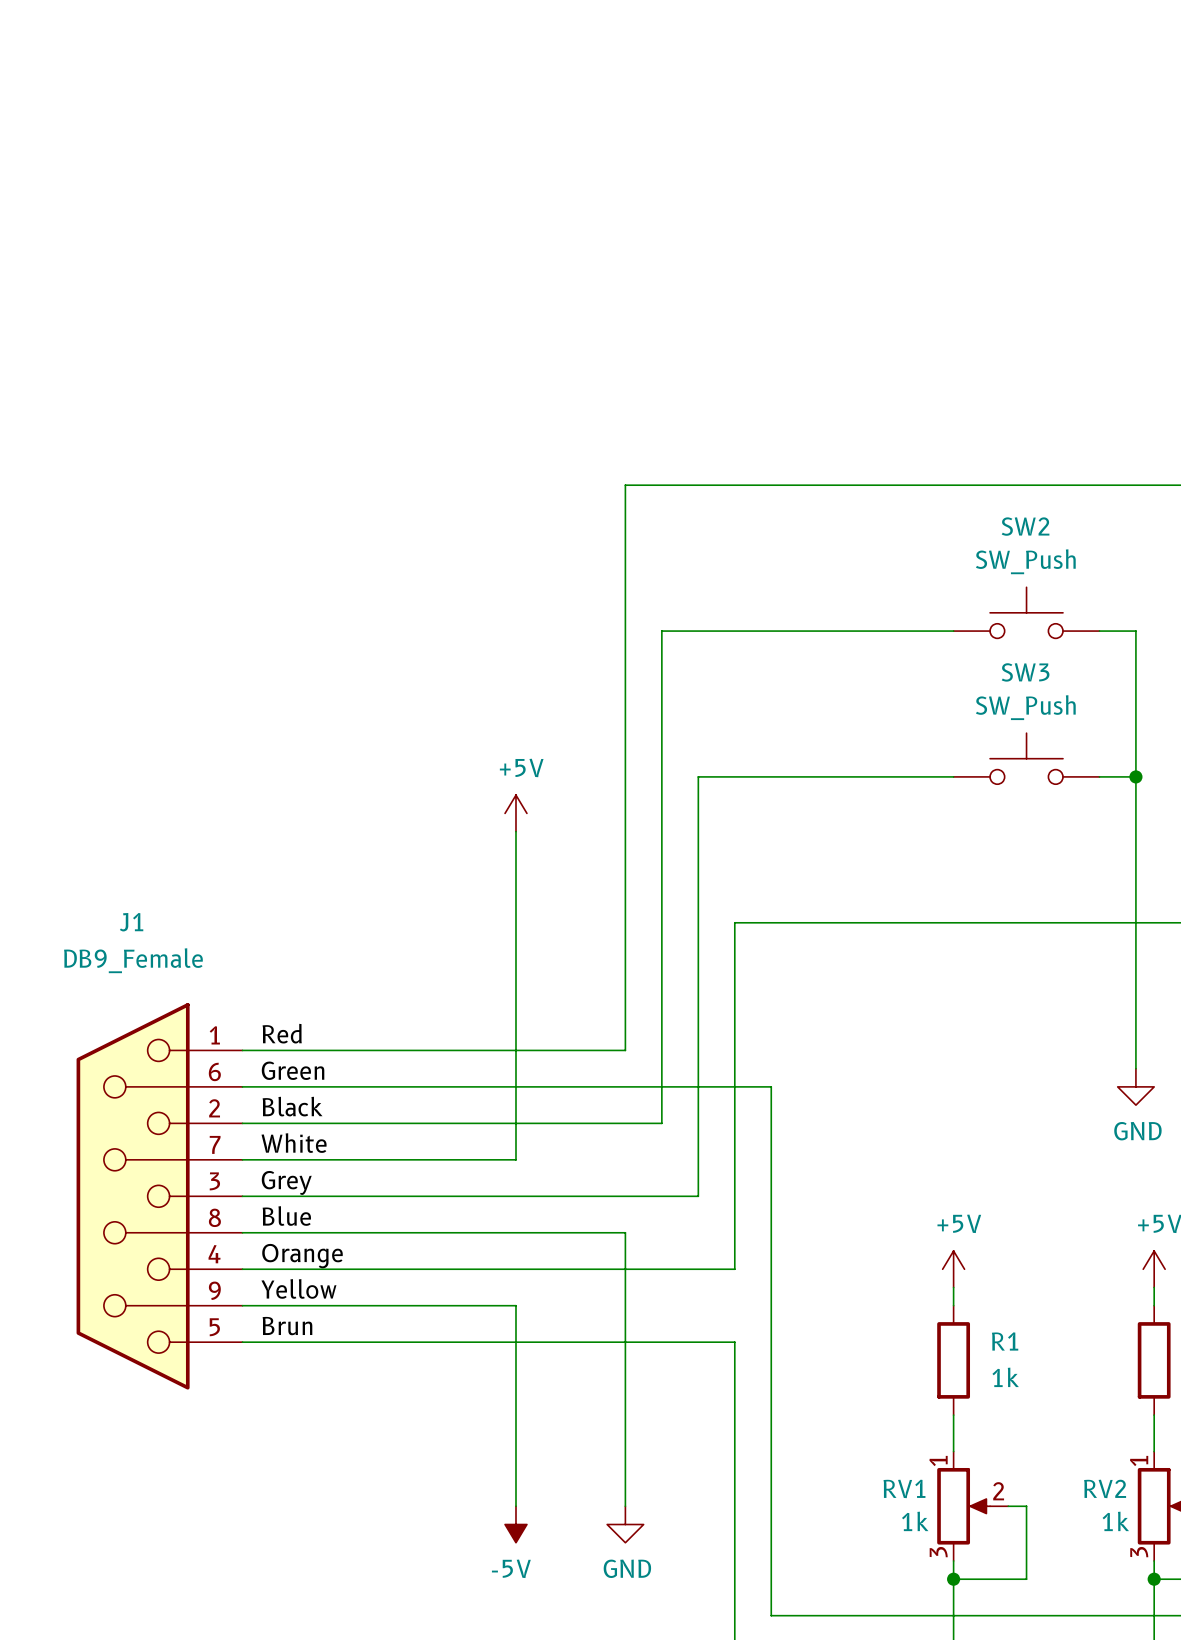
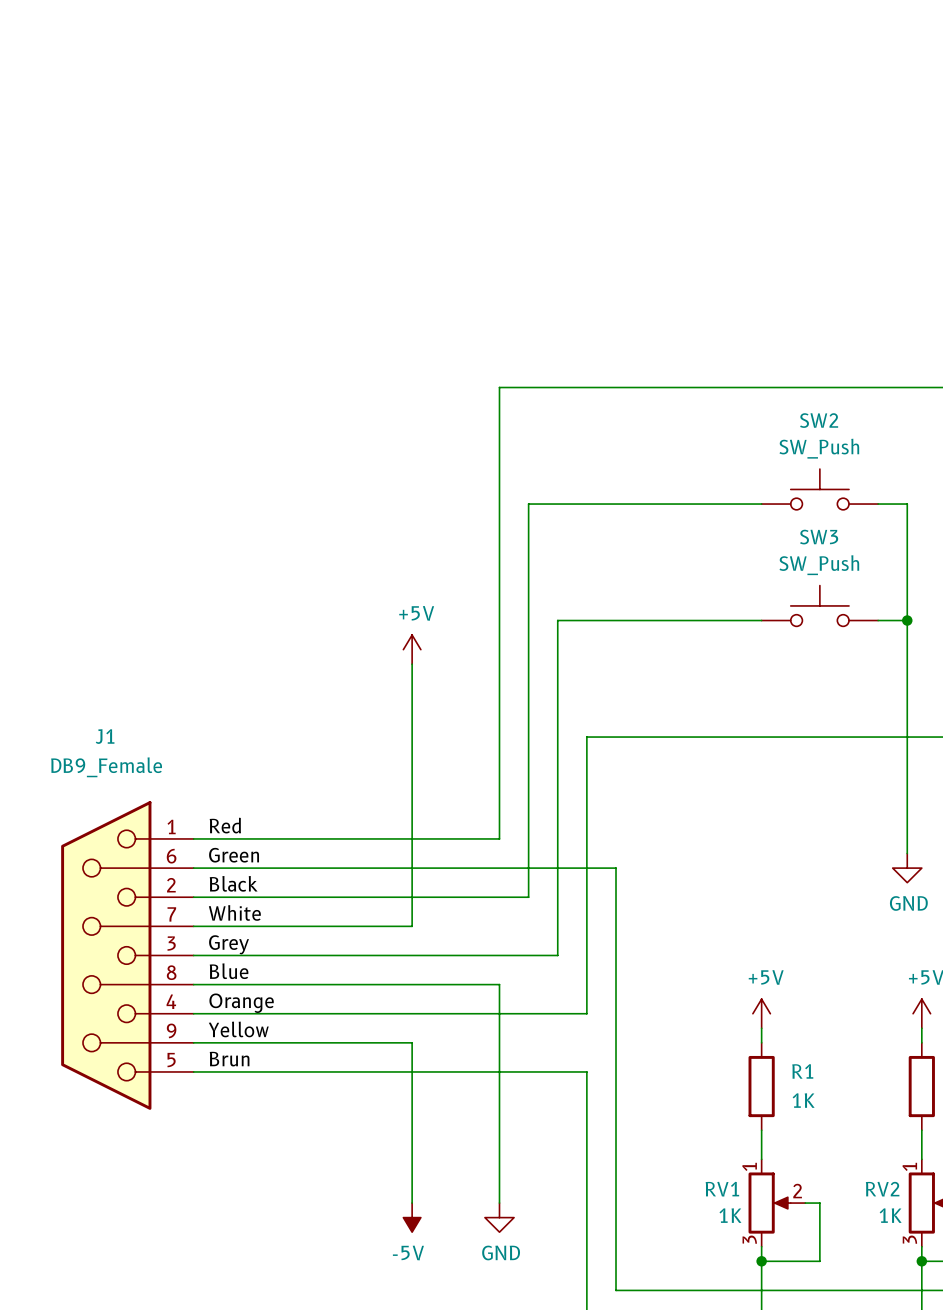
R1 value: 1k (1005, 1377) -> 1K (803, 1100)
RV1 value: 1k (915, 1521) -> 1K (730, 1215)
RV2 value: 1k (1115, 1521) -> 1K (890, 1215)

